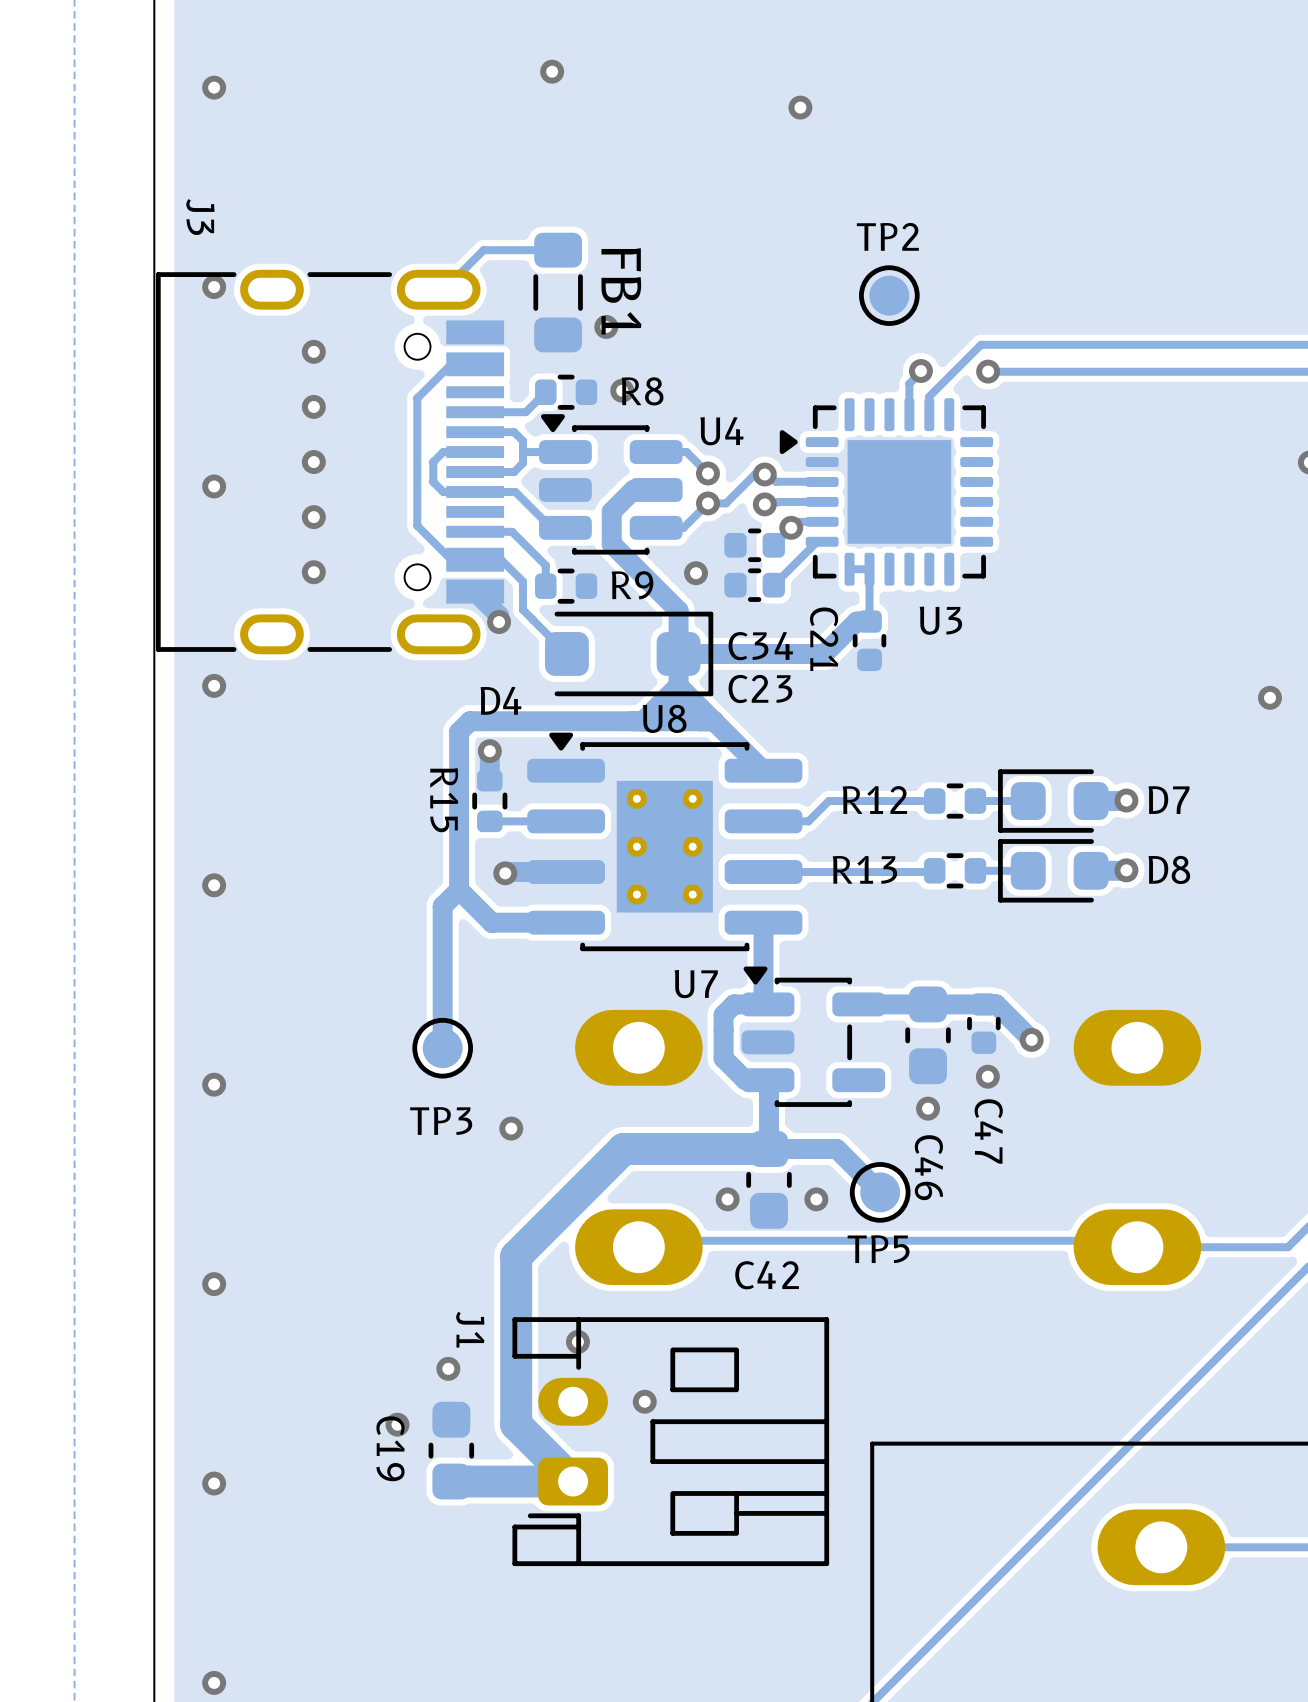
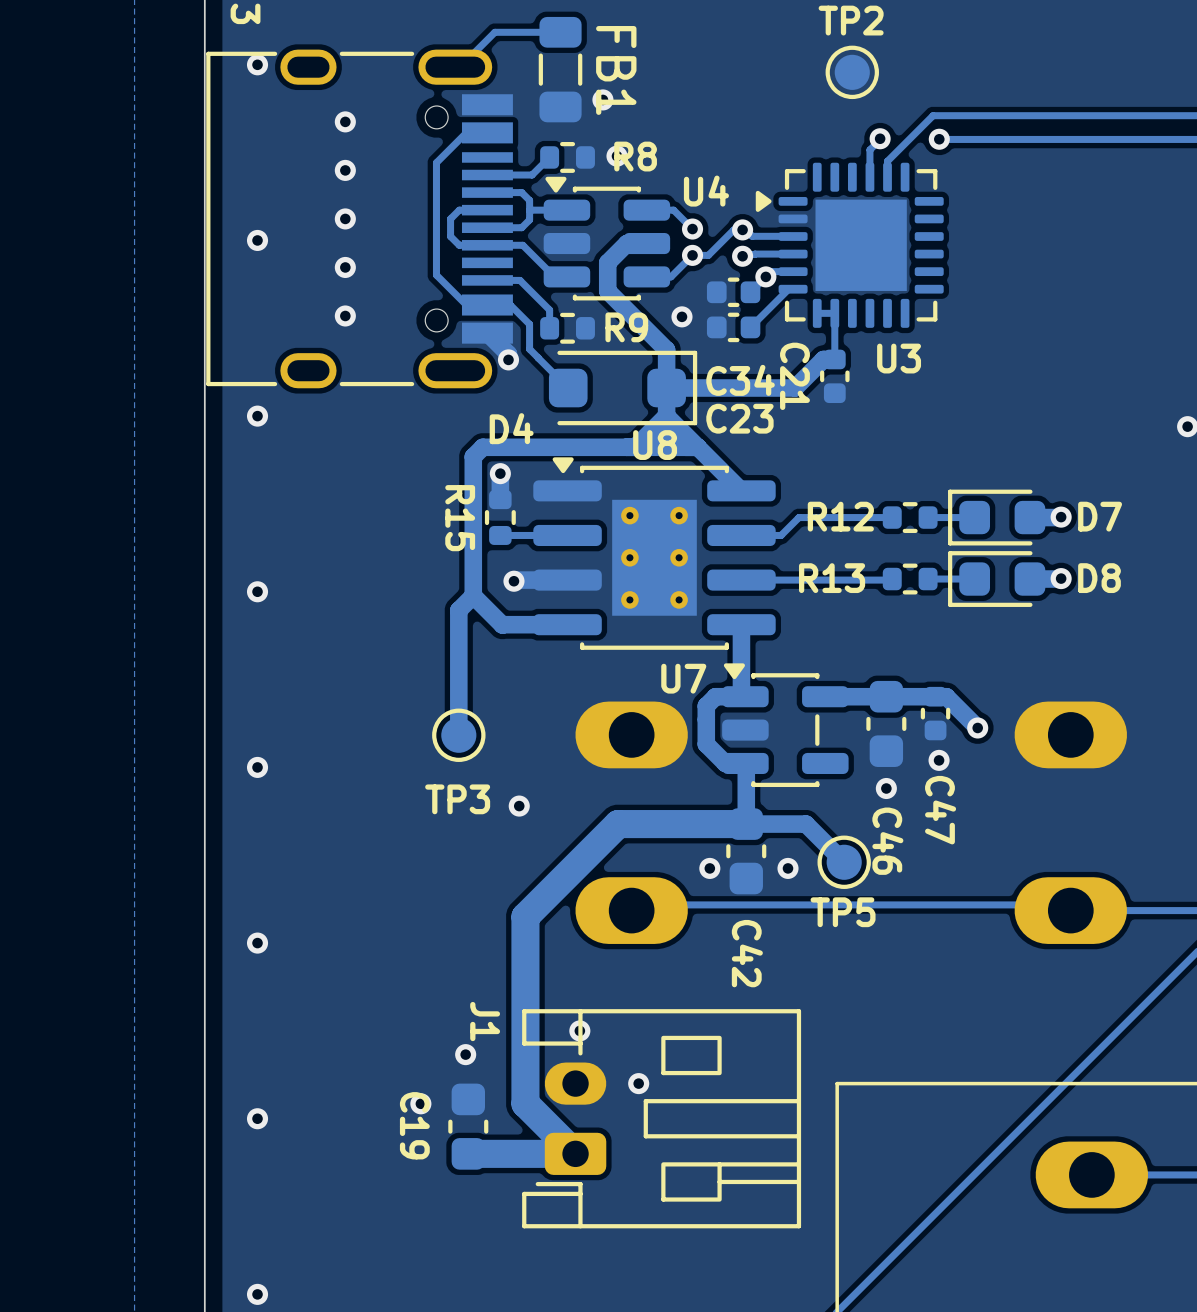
track: (518, 1254) (516, 1256) (516, 1424) (573, 1481) (451, 1481) -> (525, 916) (525, 1103) (575, 1153) (468, 1153)
C42 name rotation: 0° (767, 1275) -> 90° clockwise (747, 953)
via: (577, 1341) -> none
via: (448, 1368) -> none
via: none -> (579, 1030)
via: (644, 1401) -> none
via: none -> (465, 1054)
via: (397, 1424) -> none
J1 position: (670, 1441) -> (661, 1118)
via: none -> (638, 1083)
C19 position: (451, 1450) -> (468, 1126)
via: none -> (420, 1103)

